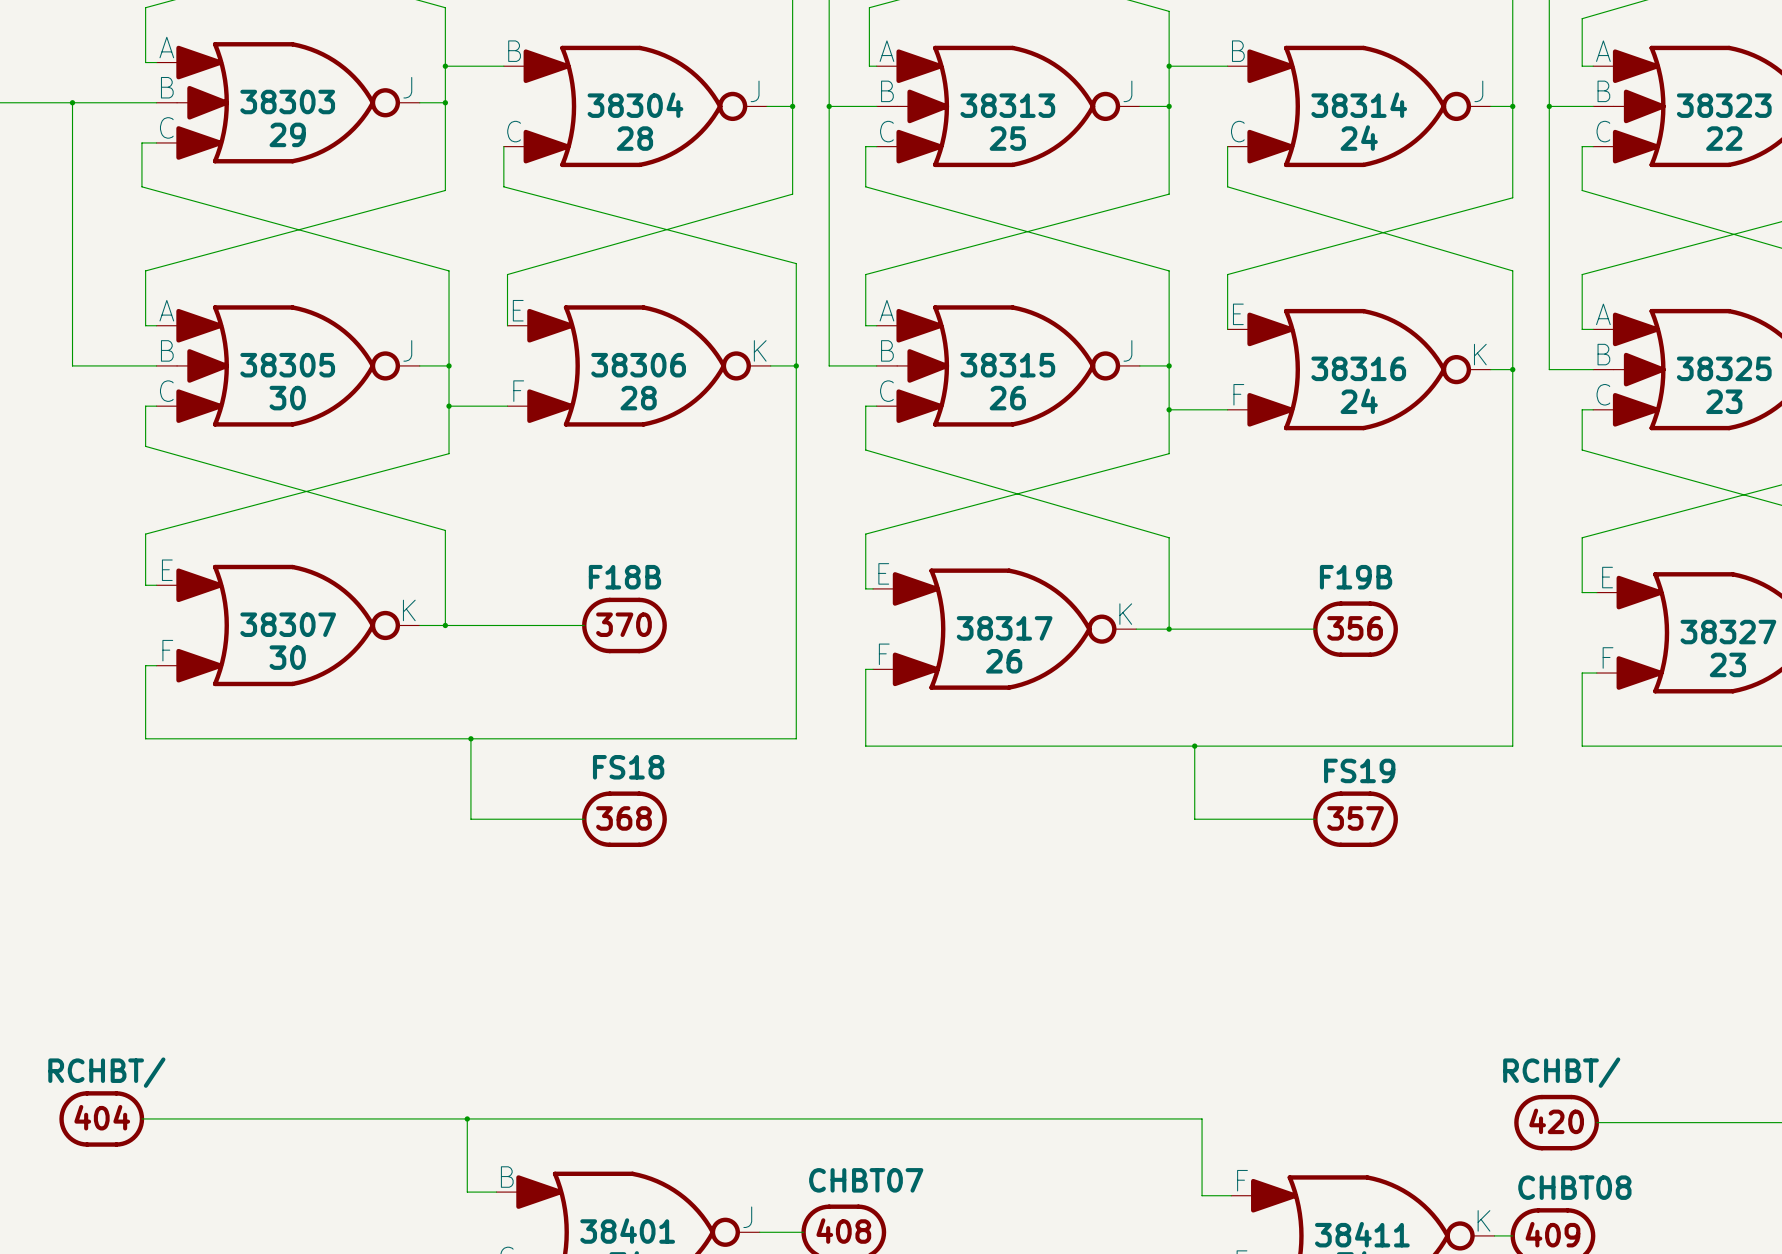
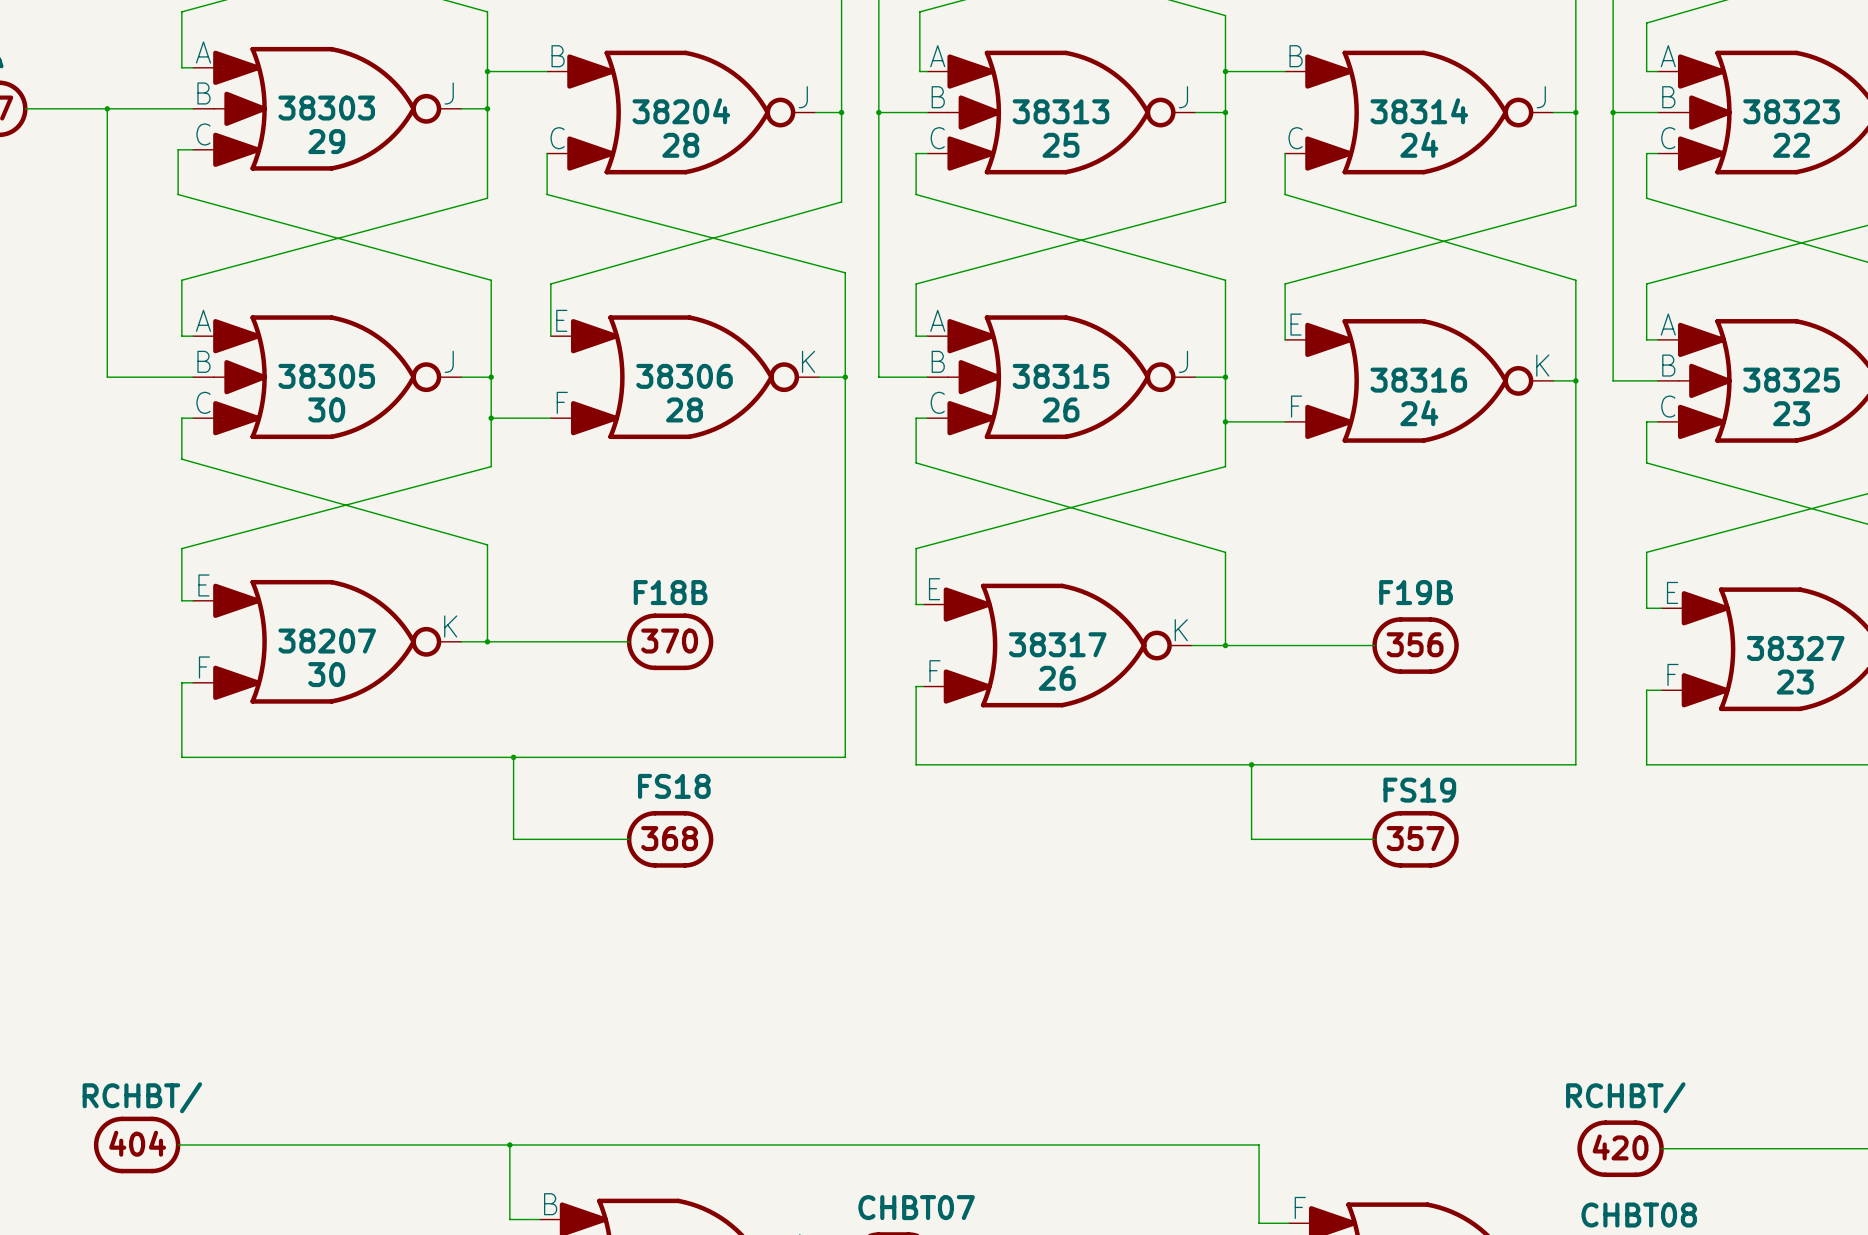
part text: 38304 (635, 105) -> 38204 (681, 111)
part text: 38307 (288, 624) -> 38207 (327, 641)

